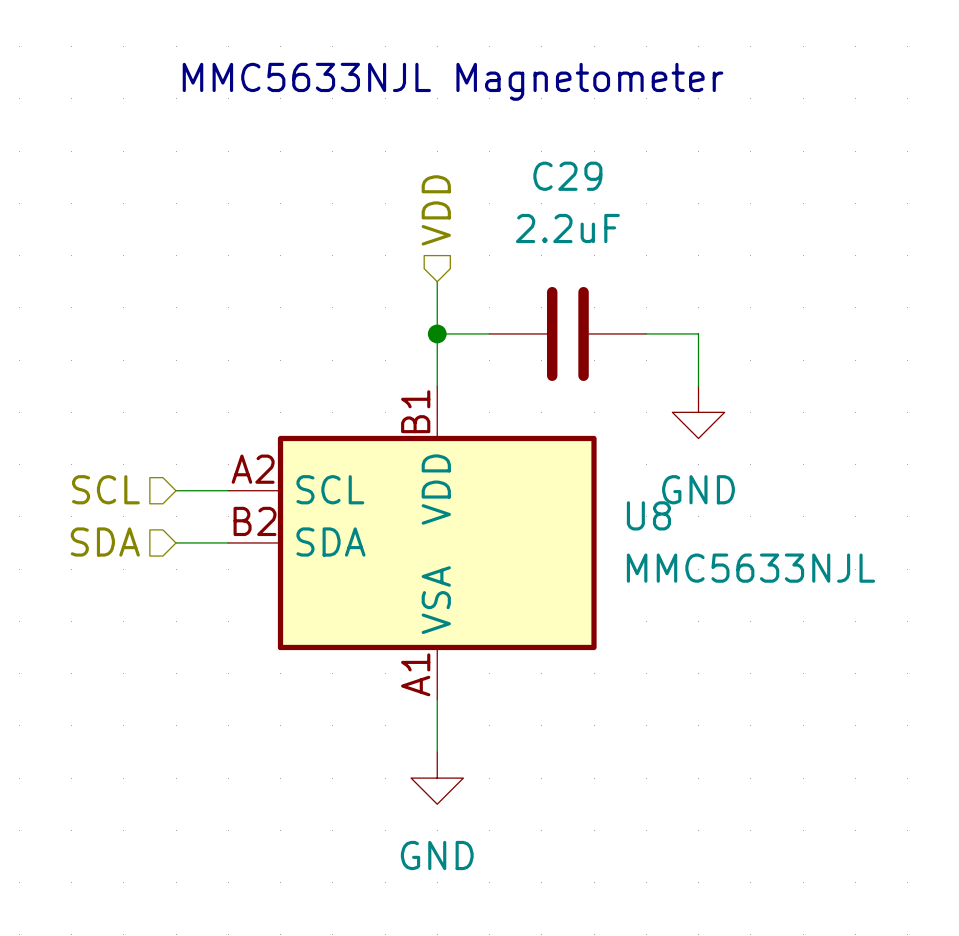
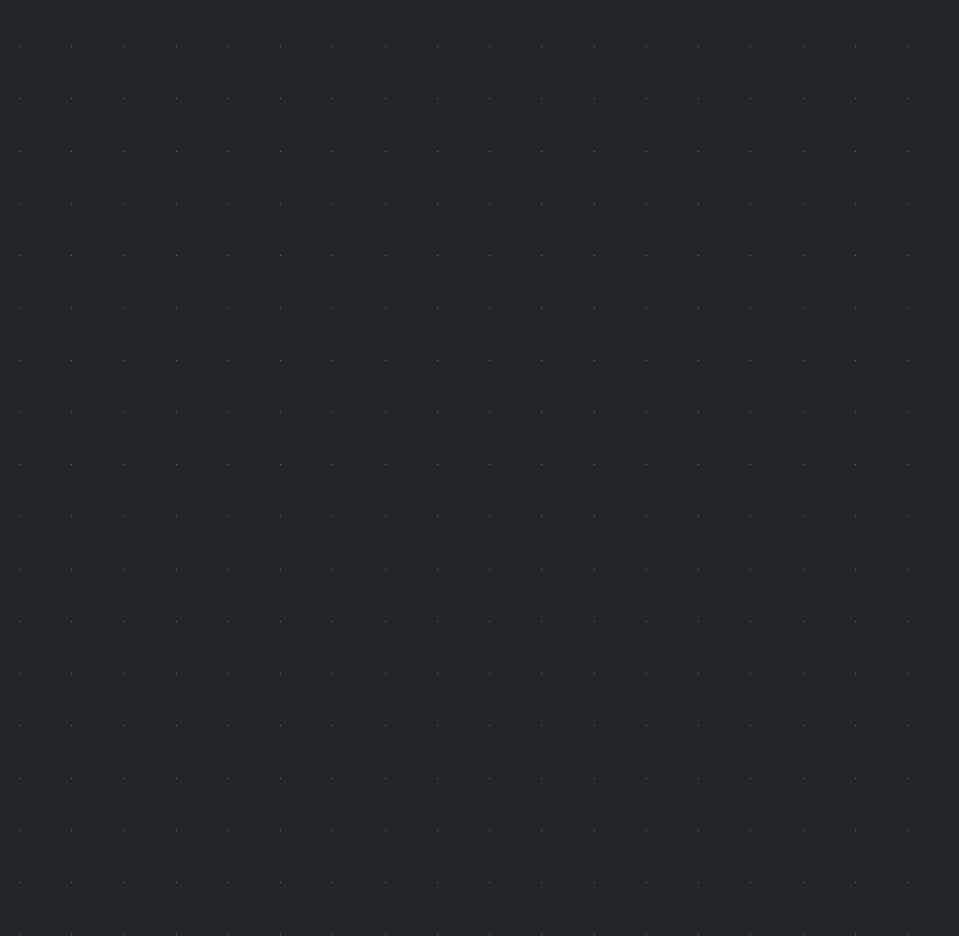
text: MMC5633NJL Magnetometer (453, 81) -> none
hierarchical label: VDD (436, 210) -> none
wire: (437, 281) (437, 386) -> none
wire: (437, 333) (489, 333) -> none
junction: (437, 333) -> none
C29: 2.2uF (567, 333) -> none
wire: (646, 333) (698, 333) (698, 386) -> none
power symbol: GND (698, 412) -> none
hierarchical label: SCL (105, 489) -> none
wire: (176, 490) (228, 490) -> none
hierarchical label: SDA (105, 542) -> none
wire: (176, 542) (228, 542) -> none
U8: MMC5633NJL (412, 542) -> none
wire: (437, 699) (437, 751) -> none
power symbol: GND (437, 778) -> none

